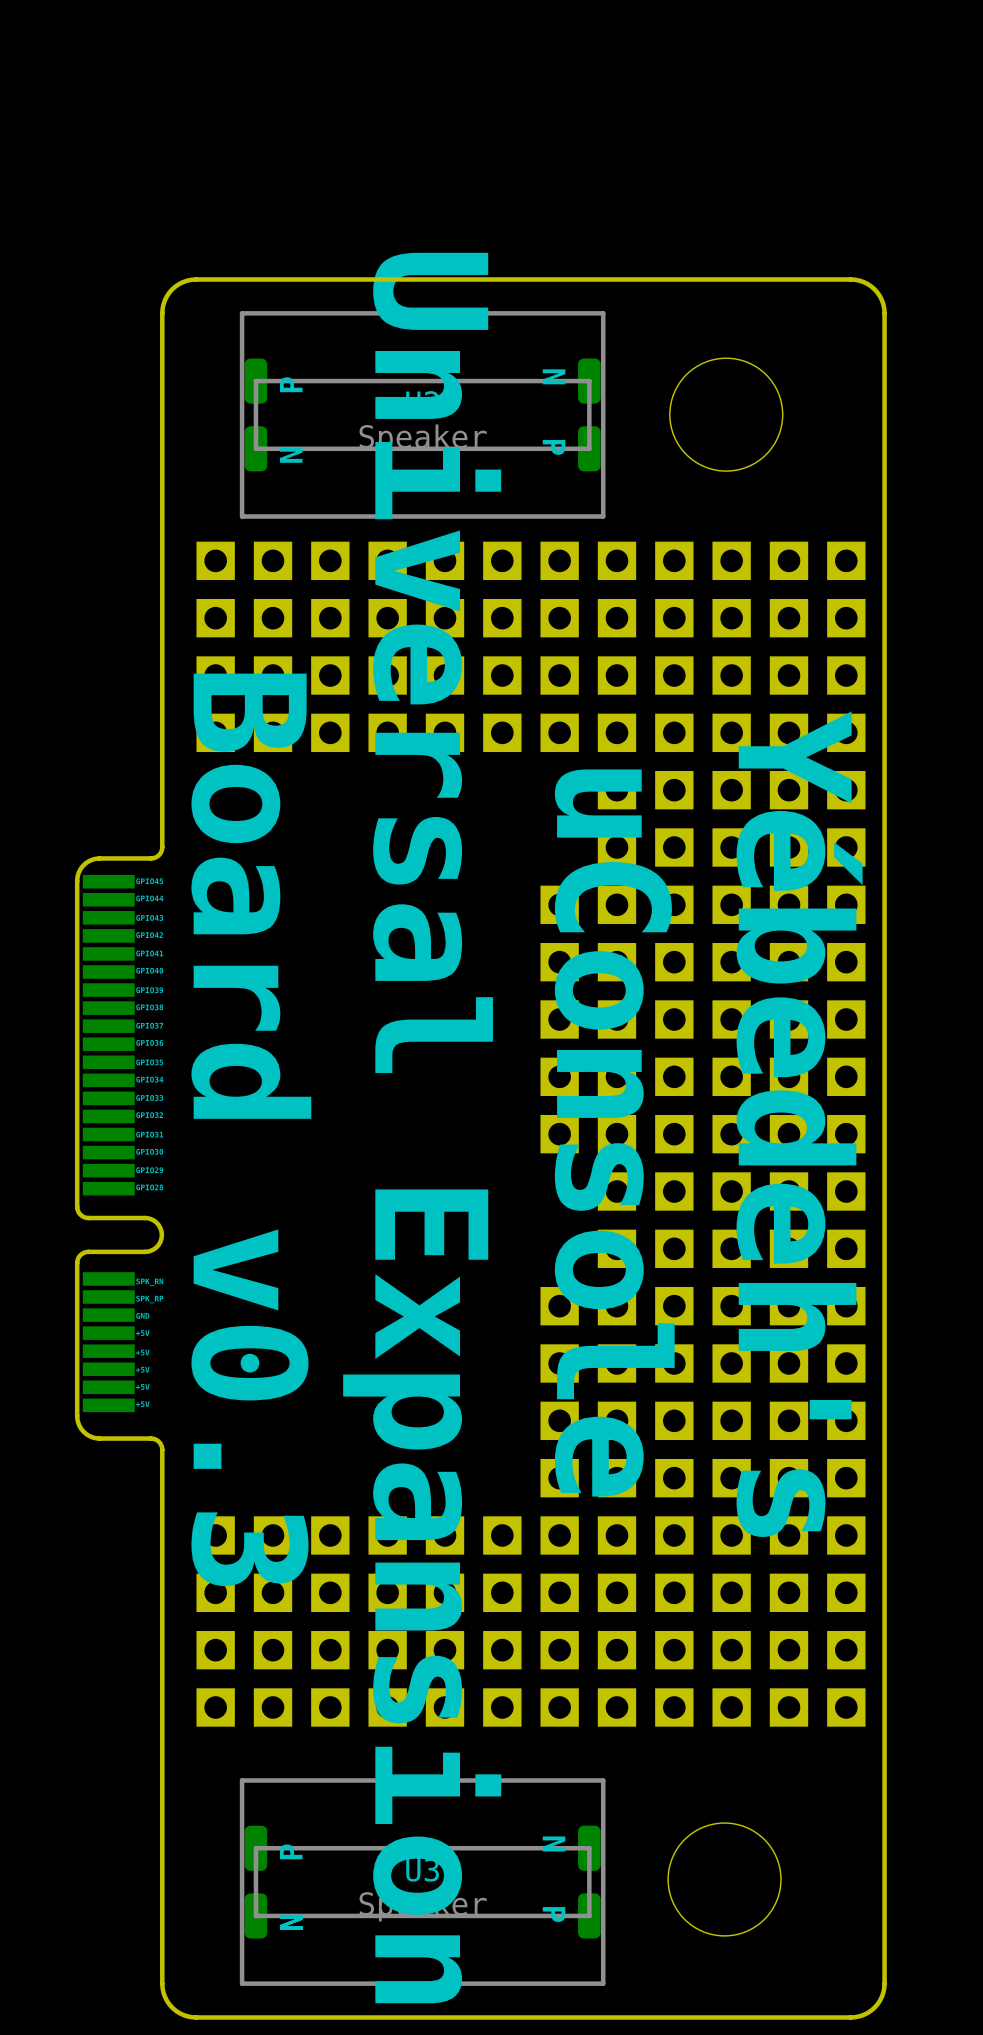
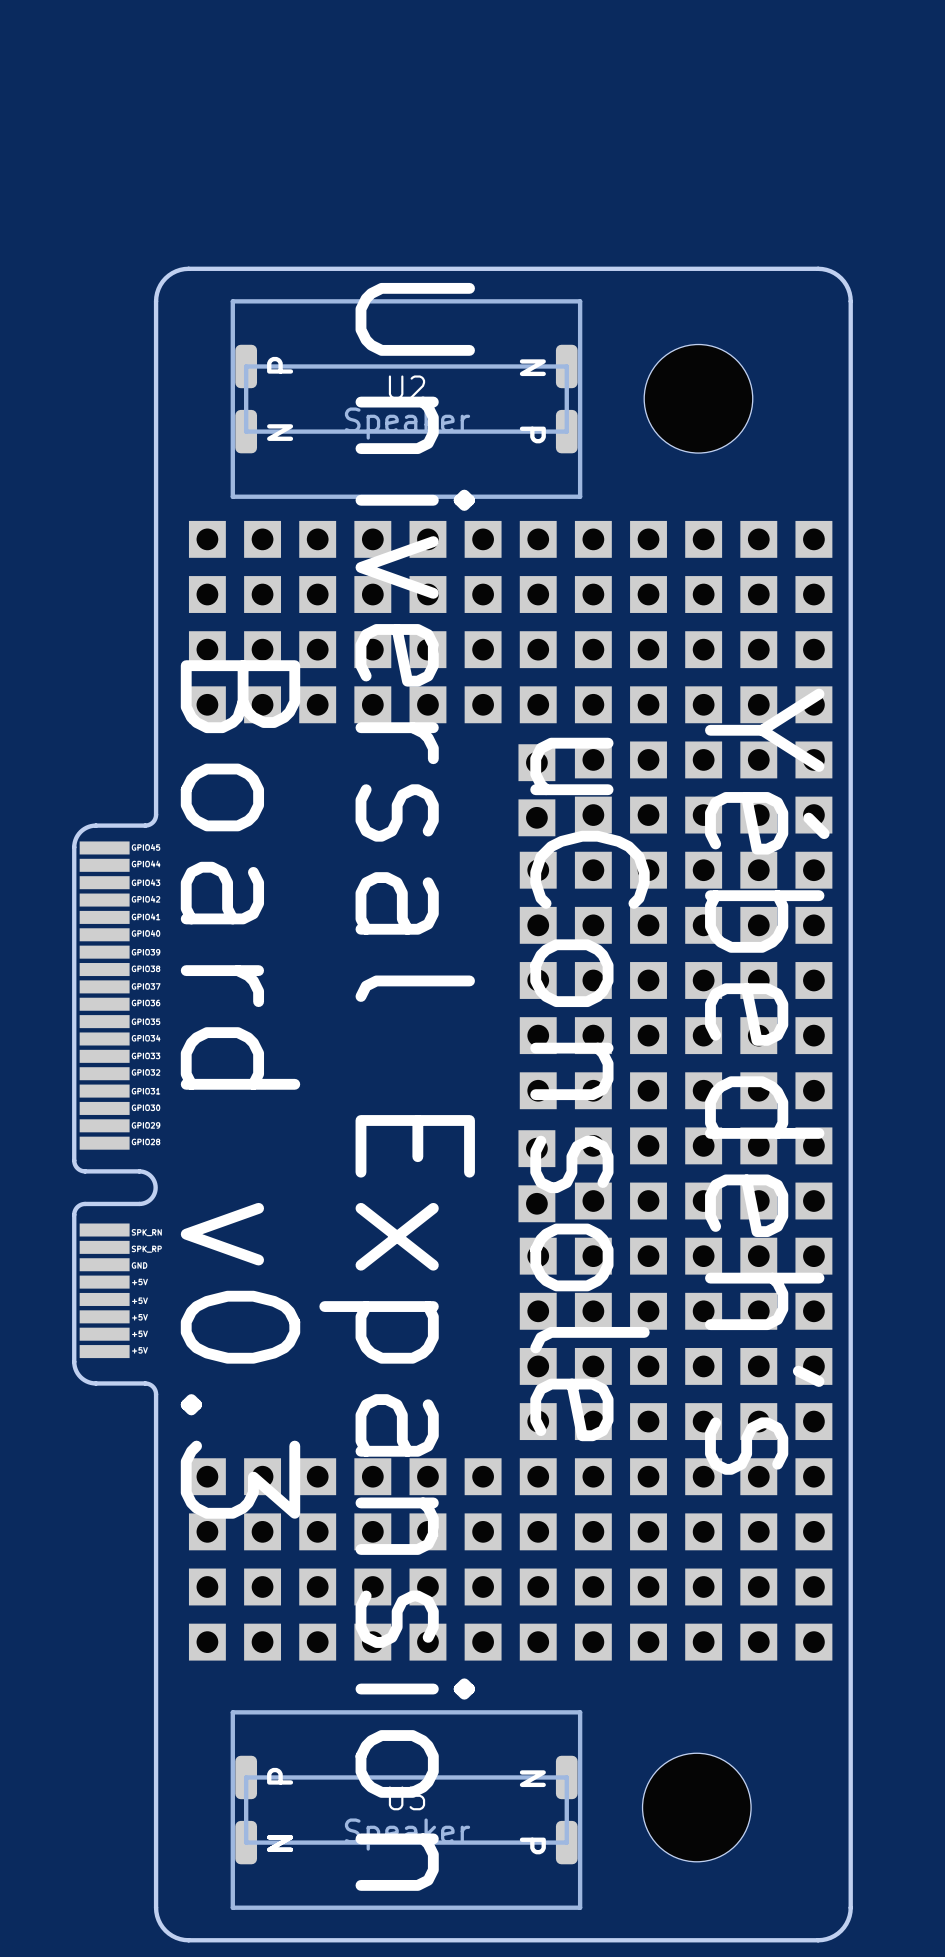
part: none -> (536, 762)
part: none -> (536, 817)
part: none -> (536, 1148)
part: none -> (536, 1203)

